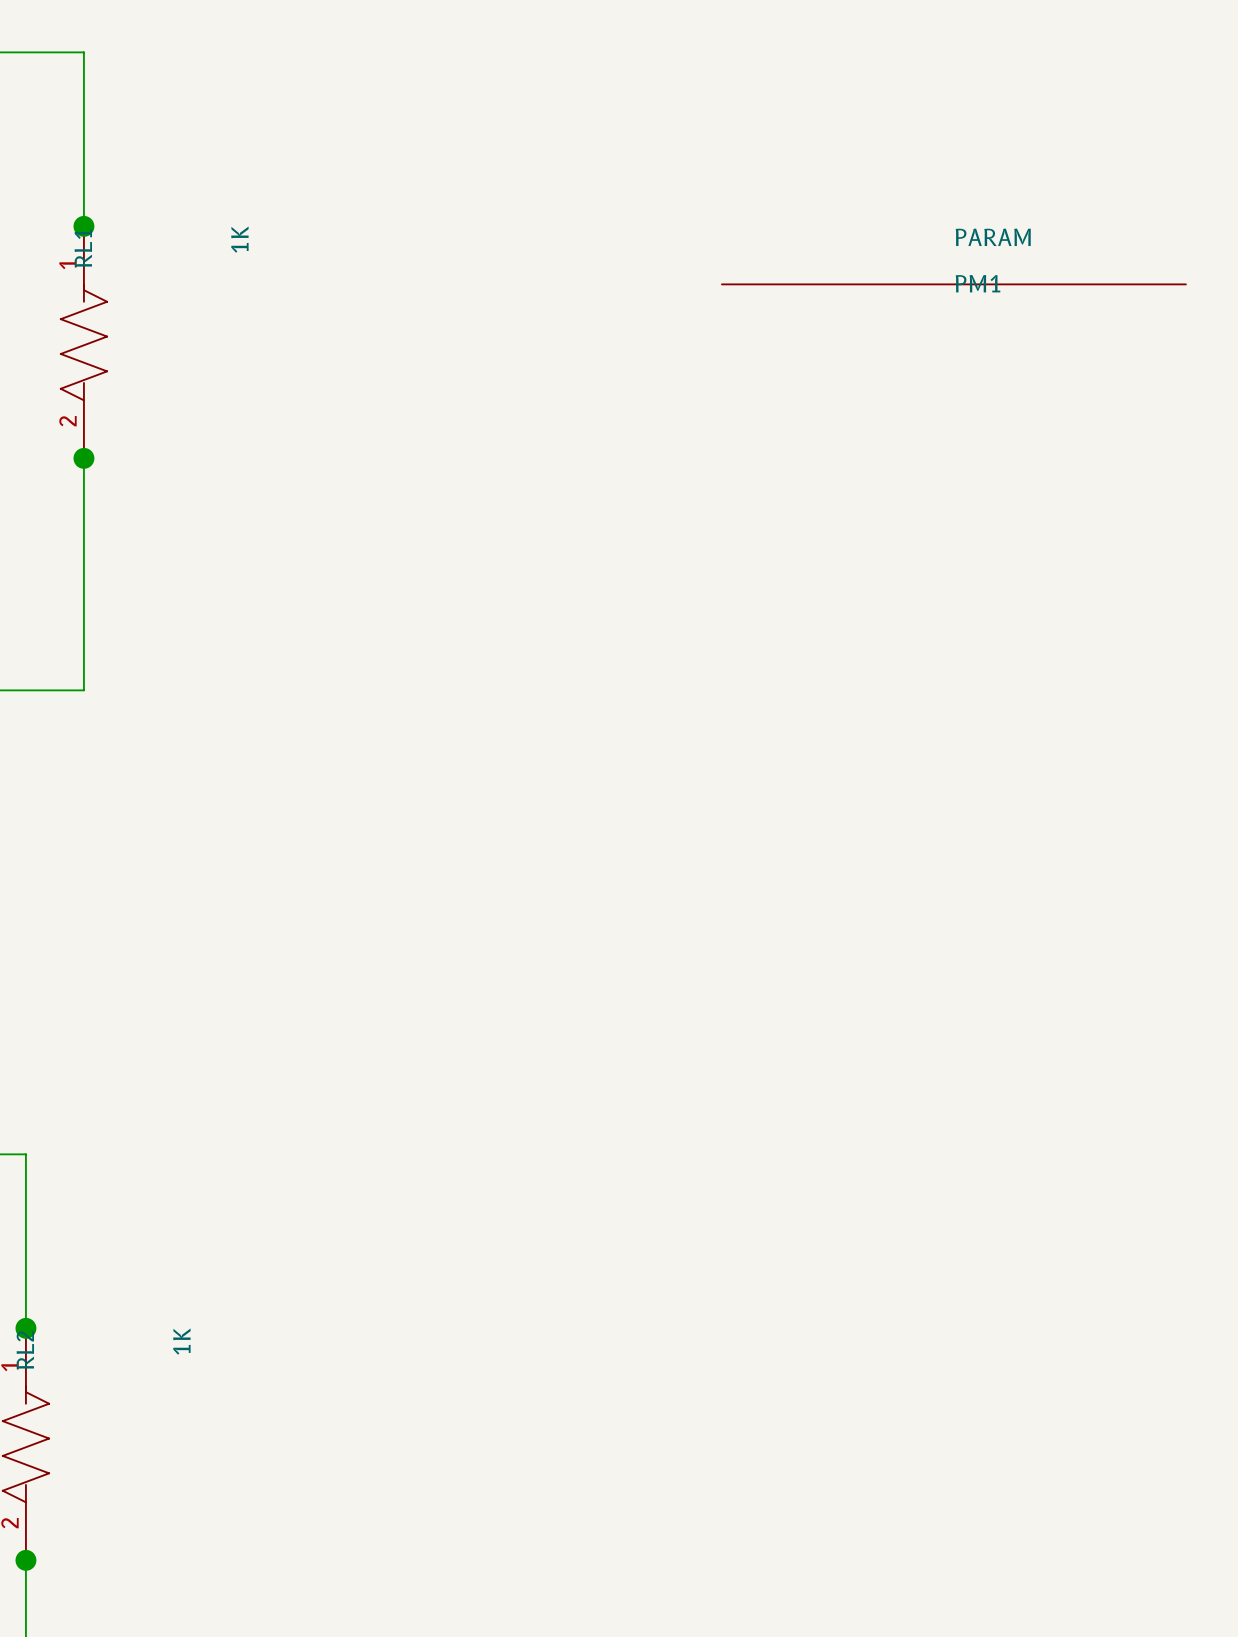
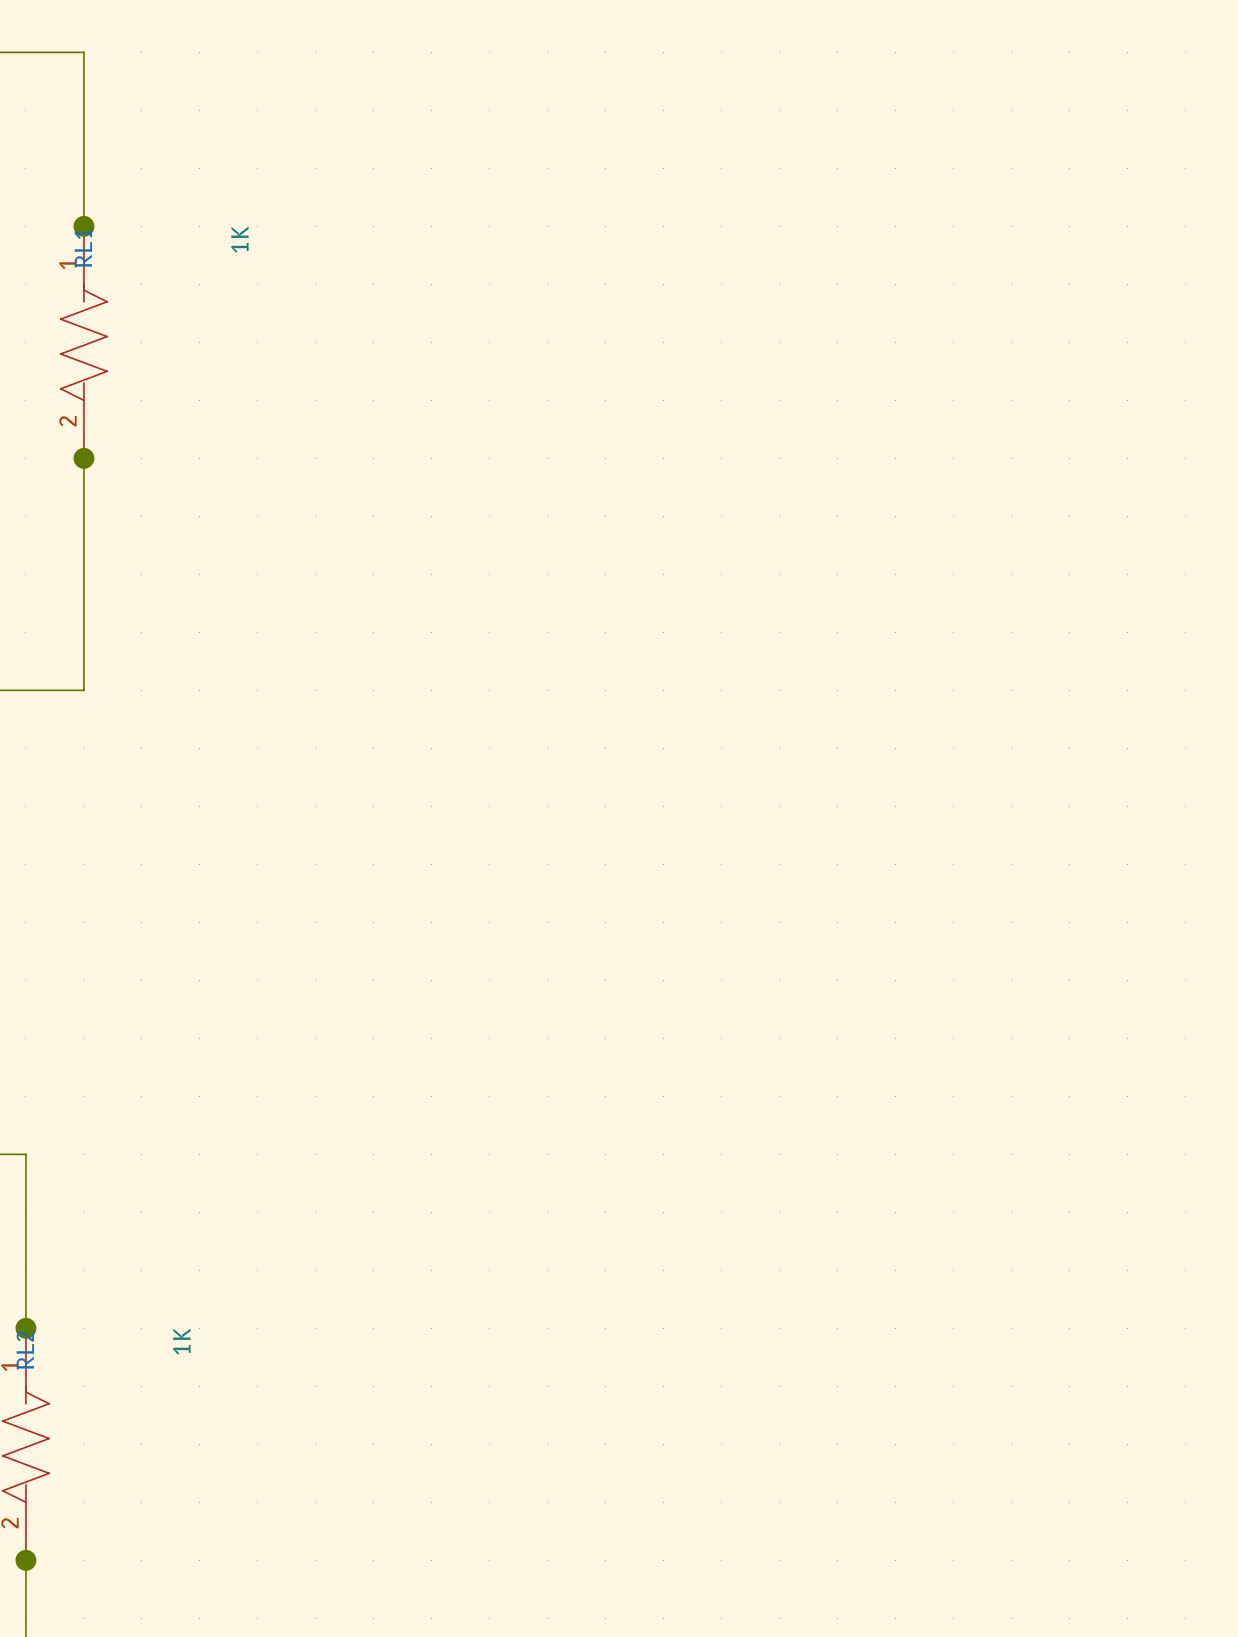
PM1: PARAM (953, 284) -> none

